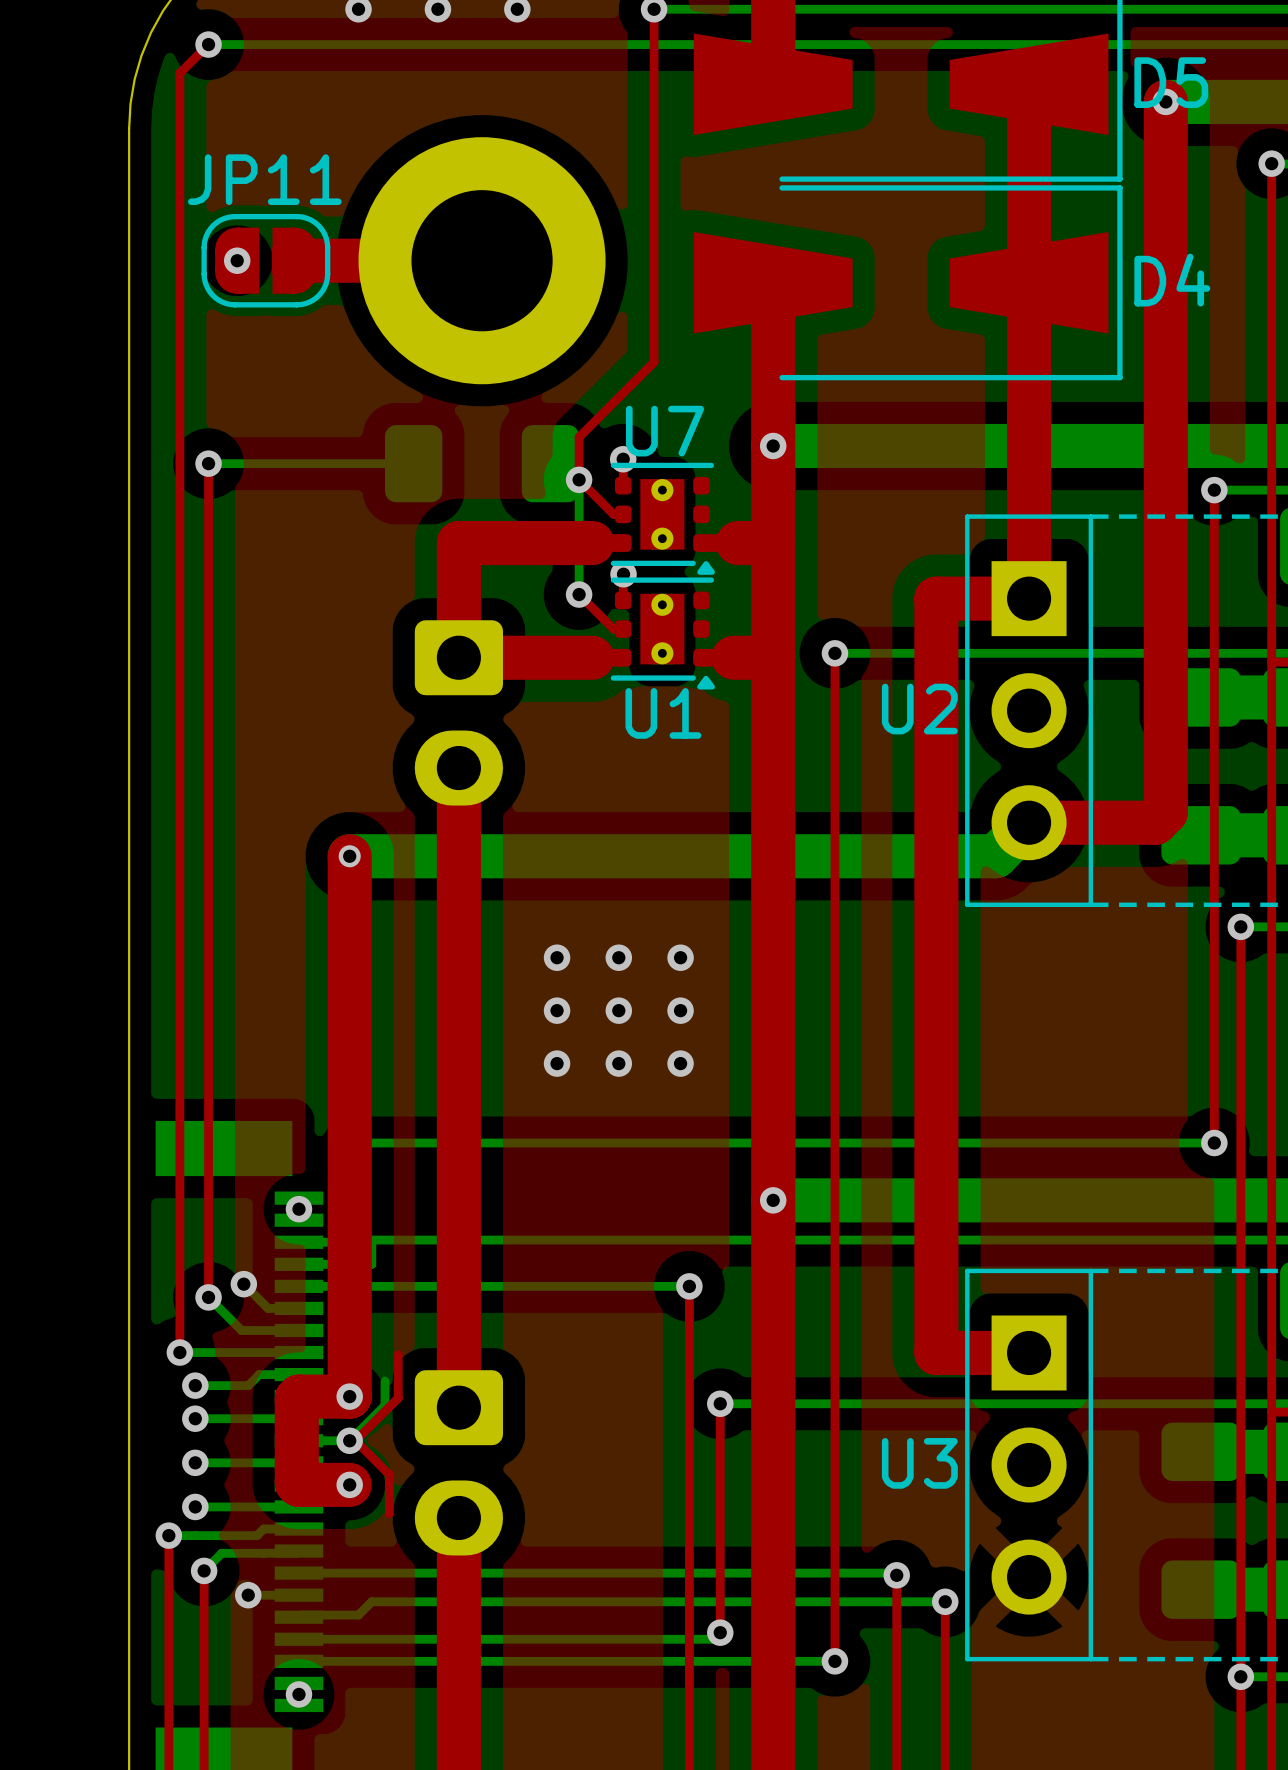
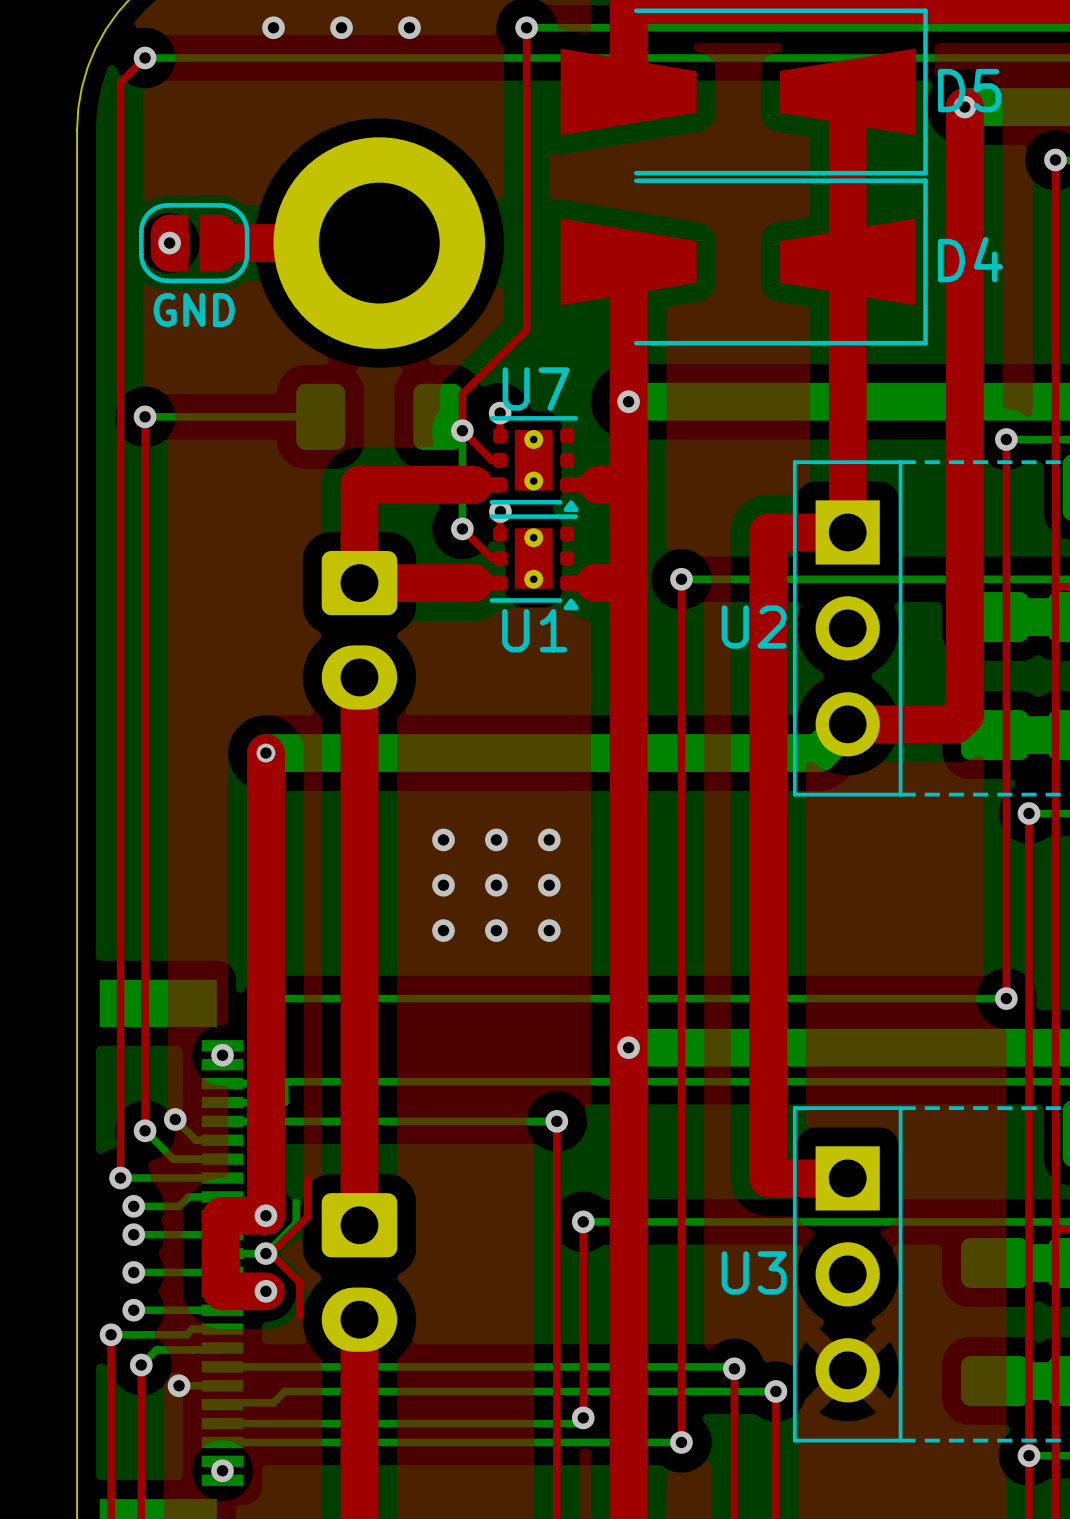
JP11 name: JP11 (264, 179) -> none
text: none -> GND (194, 310)

